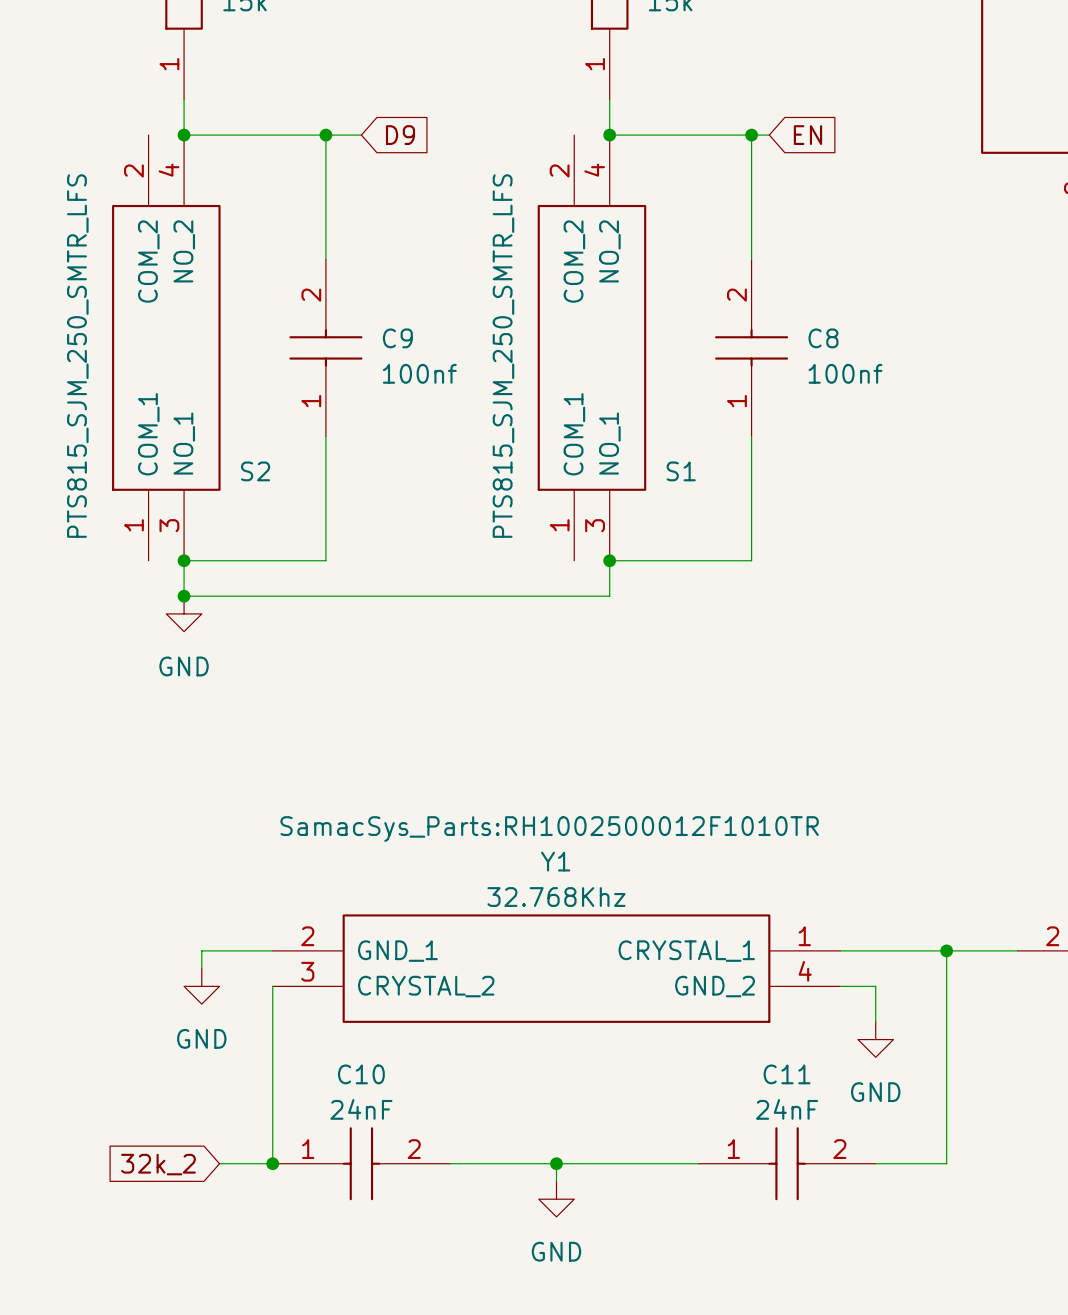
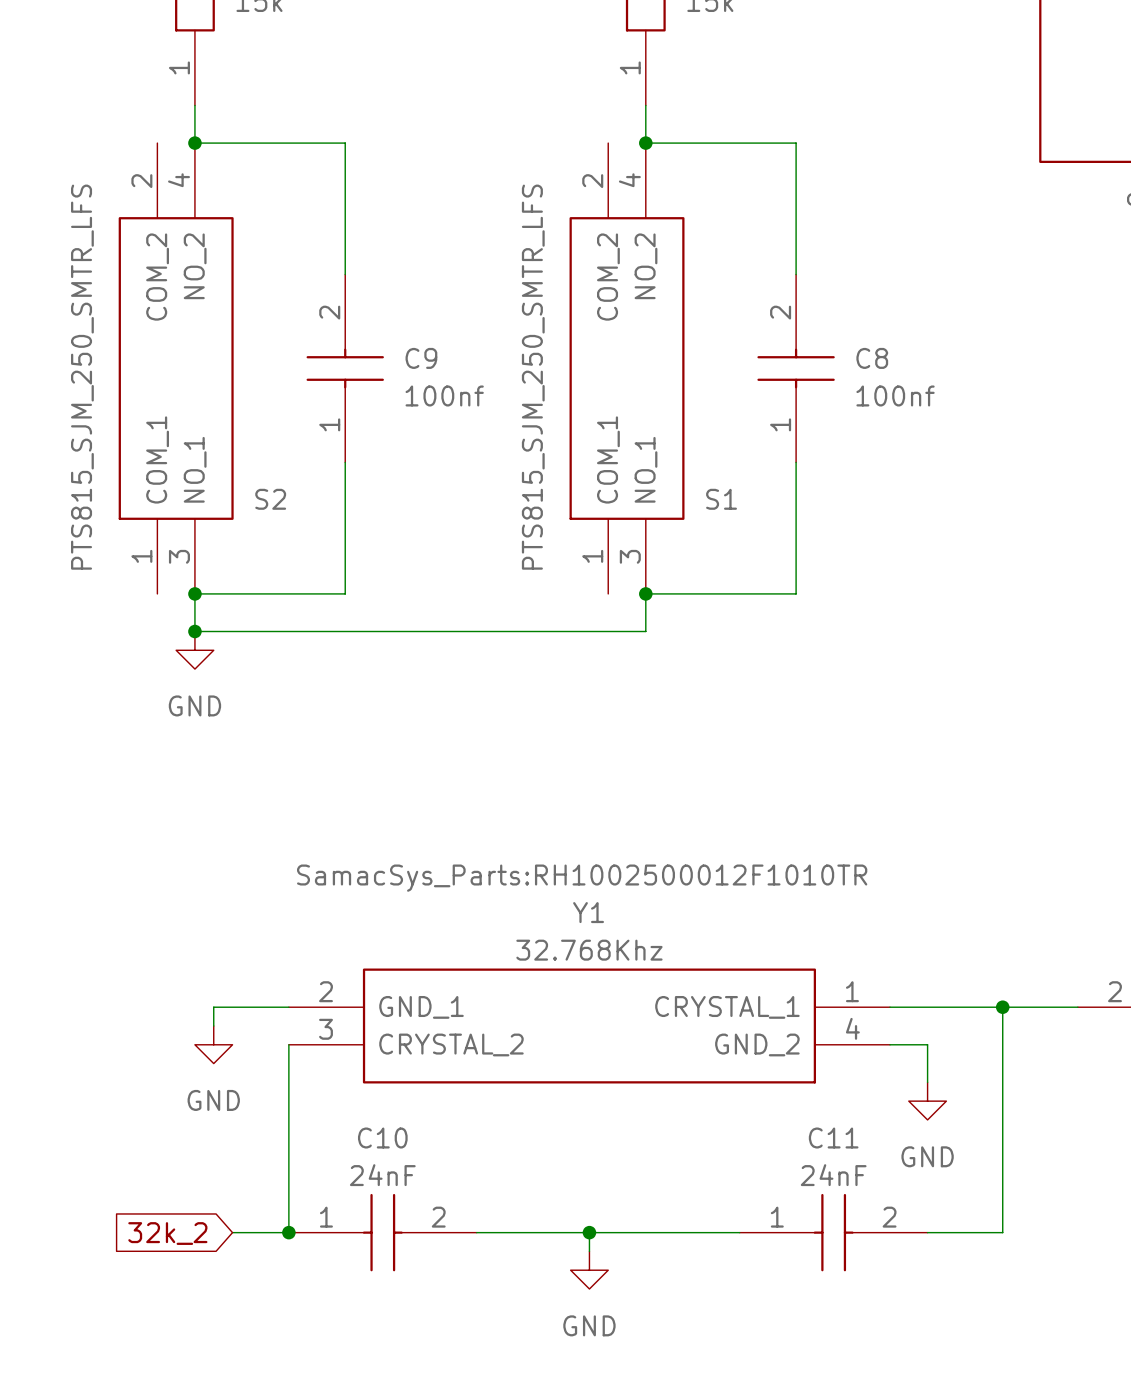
wire: (325, 135) (361, 135) -> none
junction: (325, 135) -> none
global label: D9 (400, 135) -> none
wire: (751, 135) (769, 135) -> none
junction: (751, 135) -> none
global label: EN (807, 135) -> none

